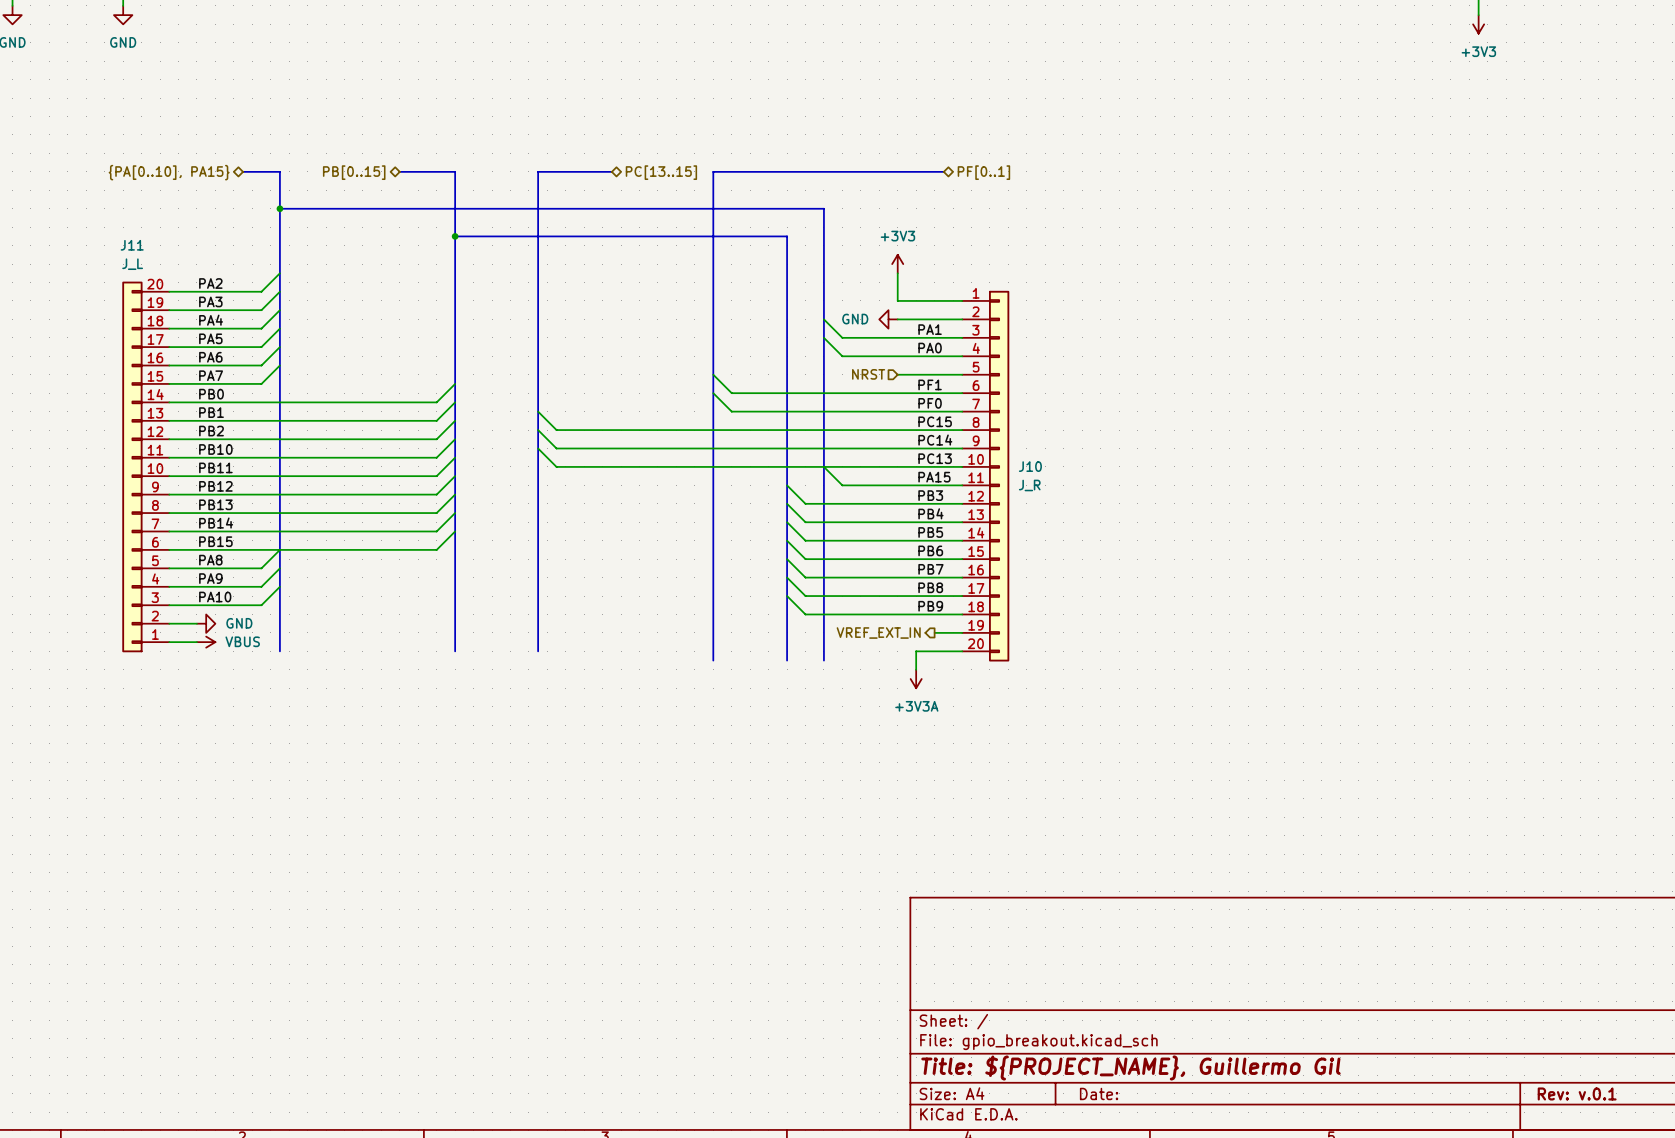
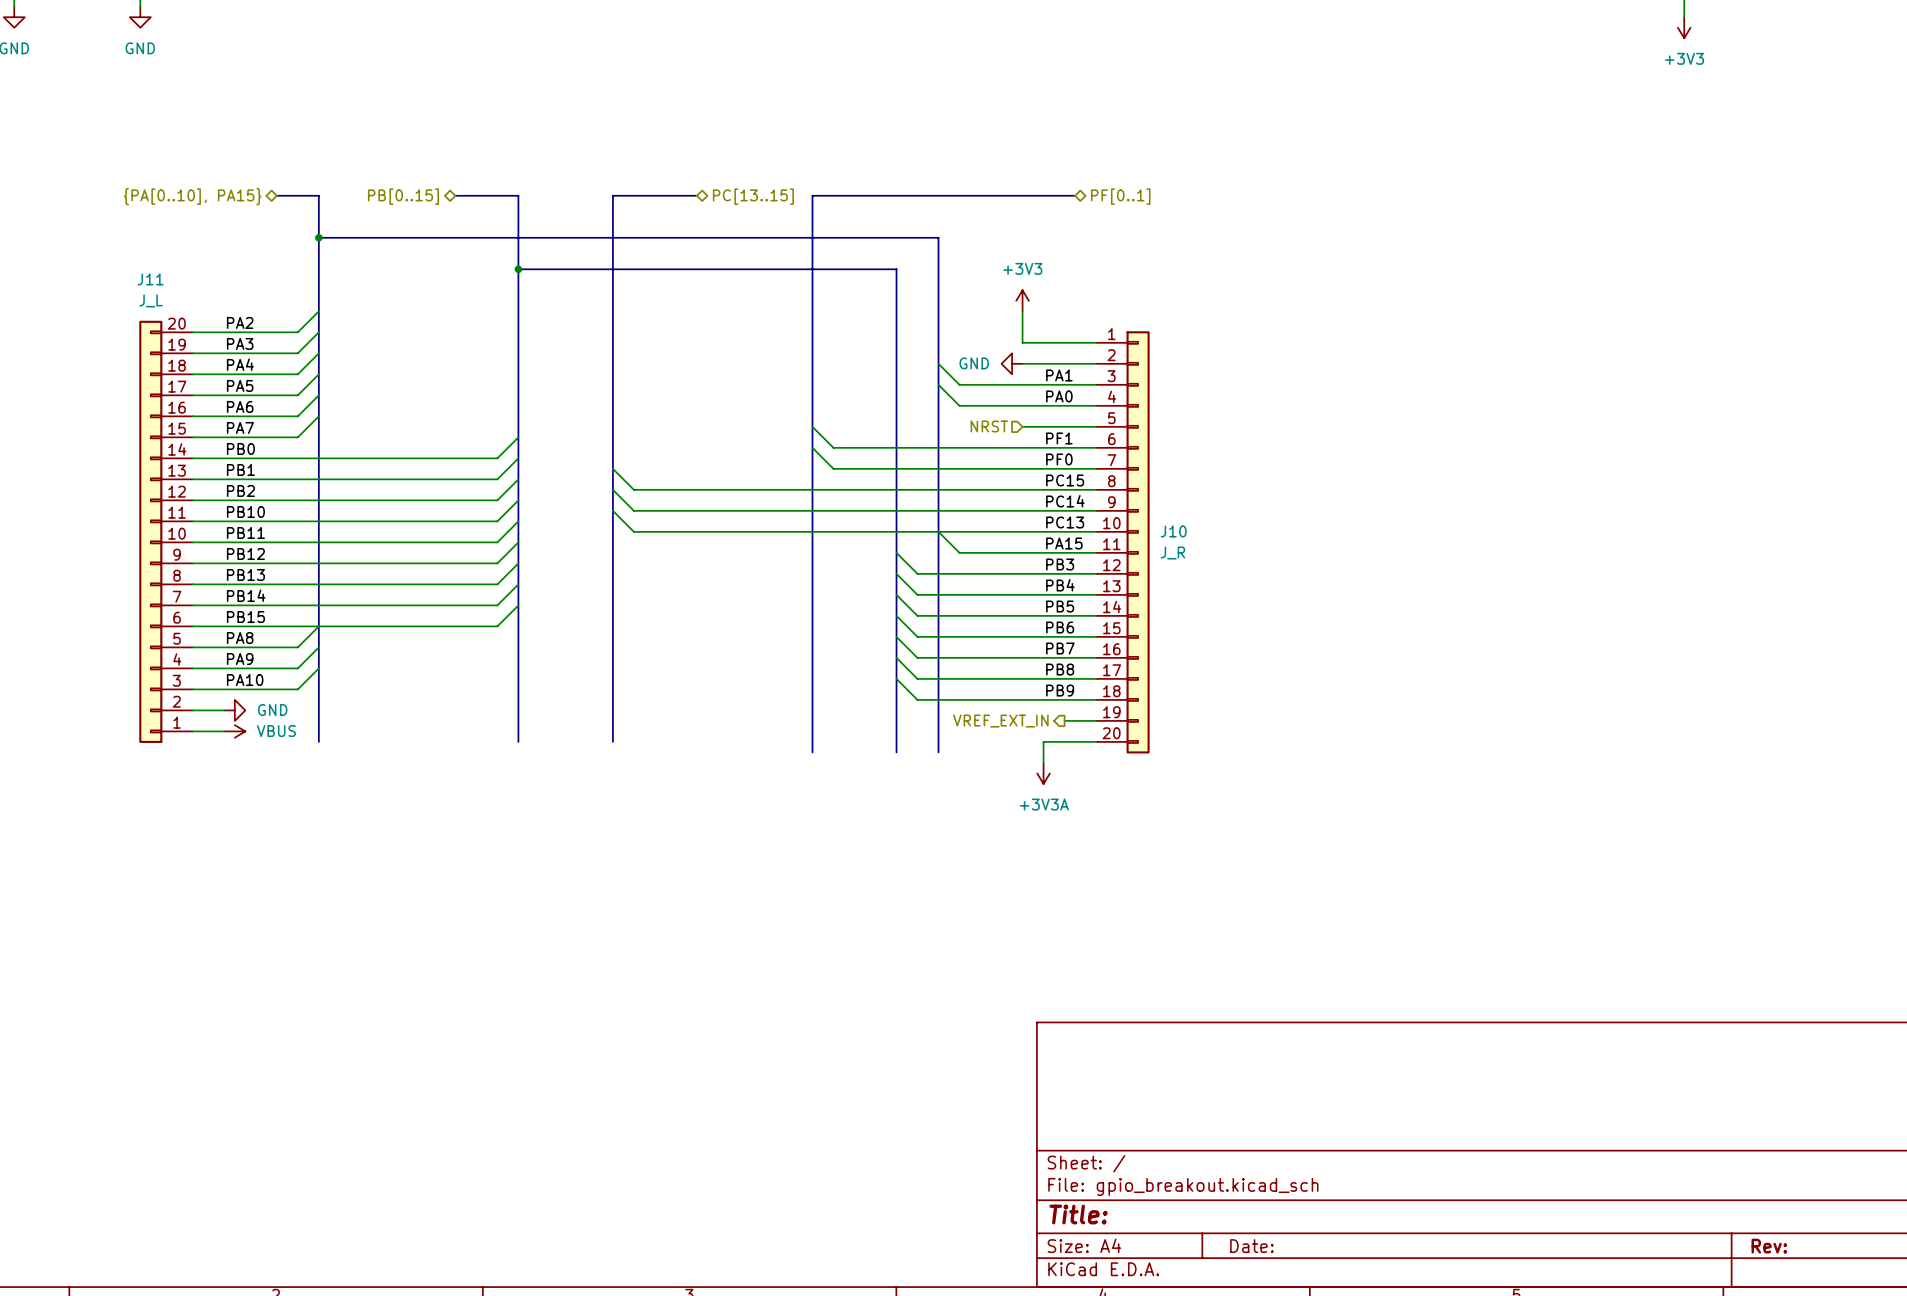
title block: Title: ${PROJECT_NAME}, Guillermo Gil (1130, 1067) -> Title: (1078, 1214)
title block: Rev: v.0.1 (1577, 1093) -> Rev: (1769, 1246)

